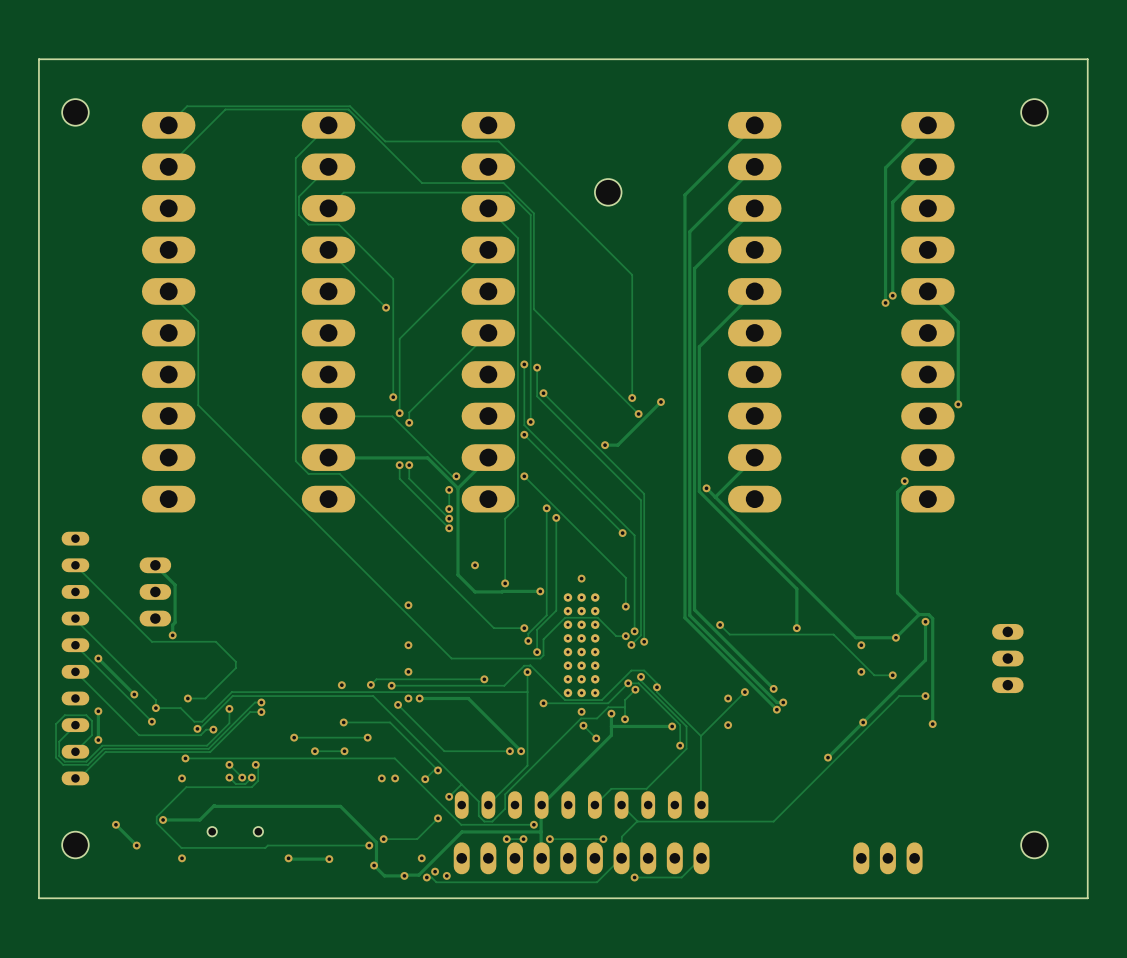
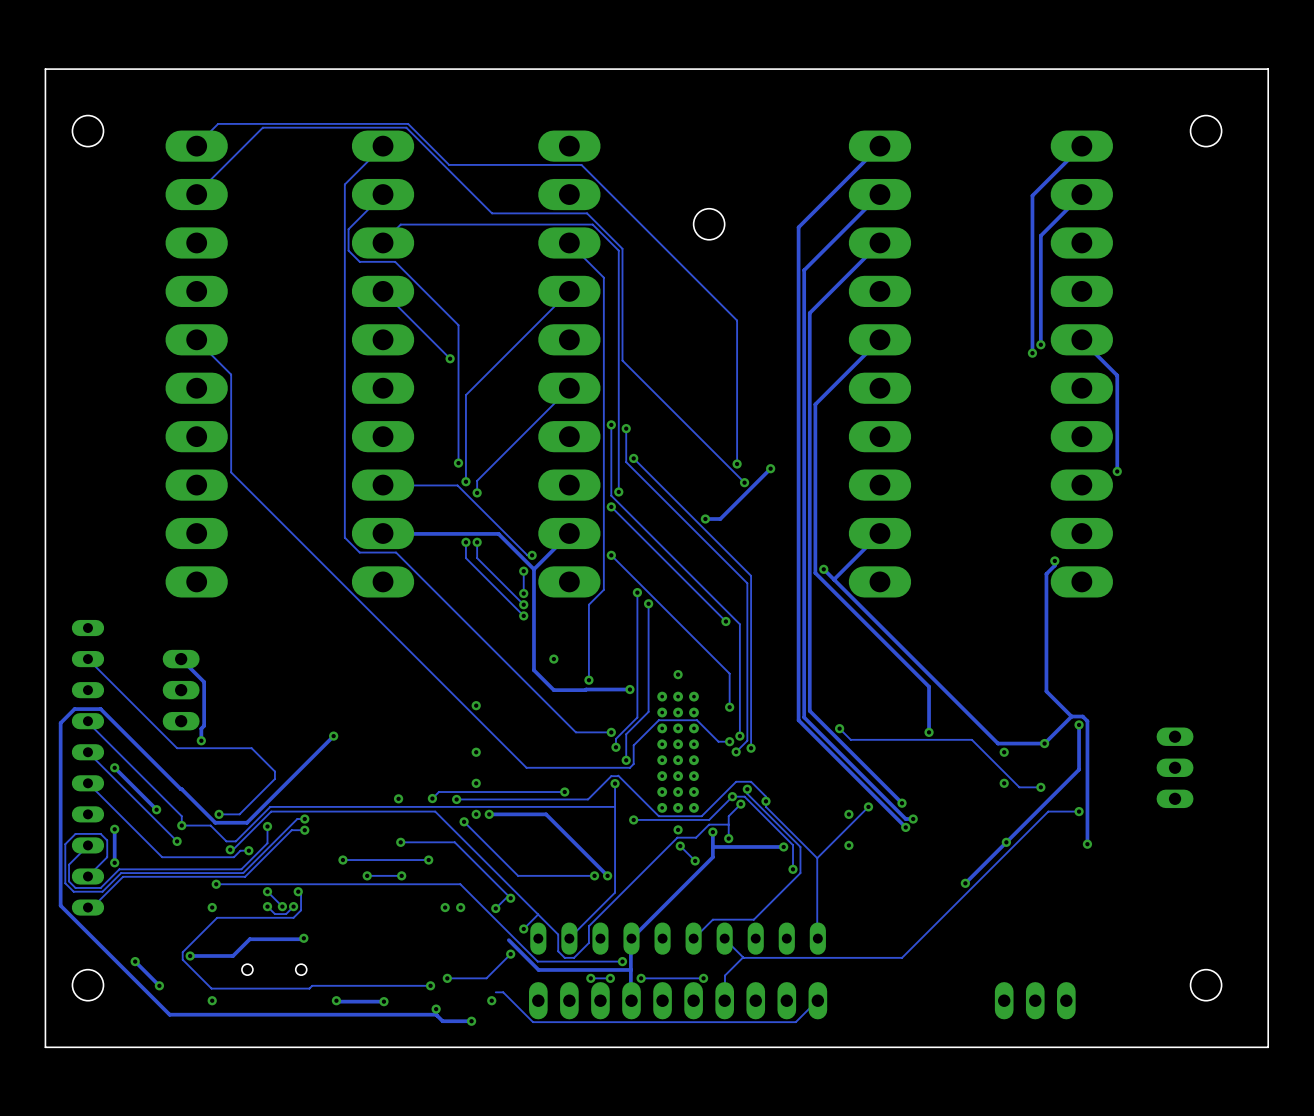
track: none -> (333, 736) (247, 822) (215, 822) (100, 709) (74, 709) (60, 723) (60, 905) (169, 1014) (436, 1014) (442, 1021) (448, 1021)
via: none -> (333, 736)
via: none -> (303, 938)
track: (214, 805) (340, 806) (376, 842) (376, 863) (374, 865) (384, 875) -> (249, 939) (303, 939)
track: (461, 831) (418, 875) (404, 875) -> (538, 969) (508, 940)
track: (621, 858) (597, 882) (436, 882) (431, 877) (426, 877) -> none
via: (435, 871) -> none
via: (446, 875) -> none
track: (682, 876) (634, 877) -> (795, 1022) (533, 1022) (503, 992) (495, 992)
via: (426, 877) -> none
via: (634, 877) -> none

